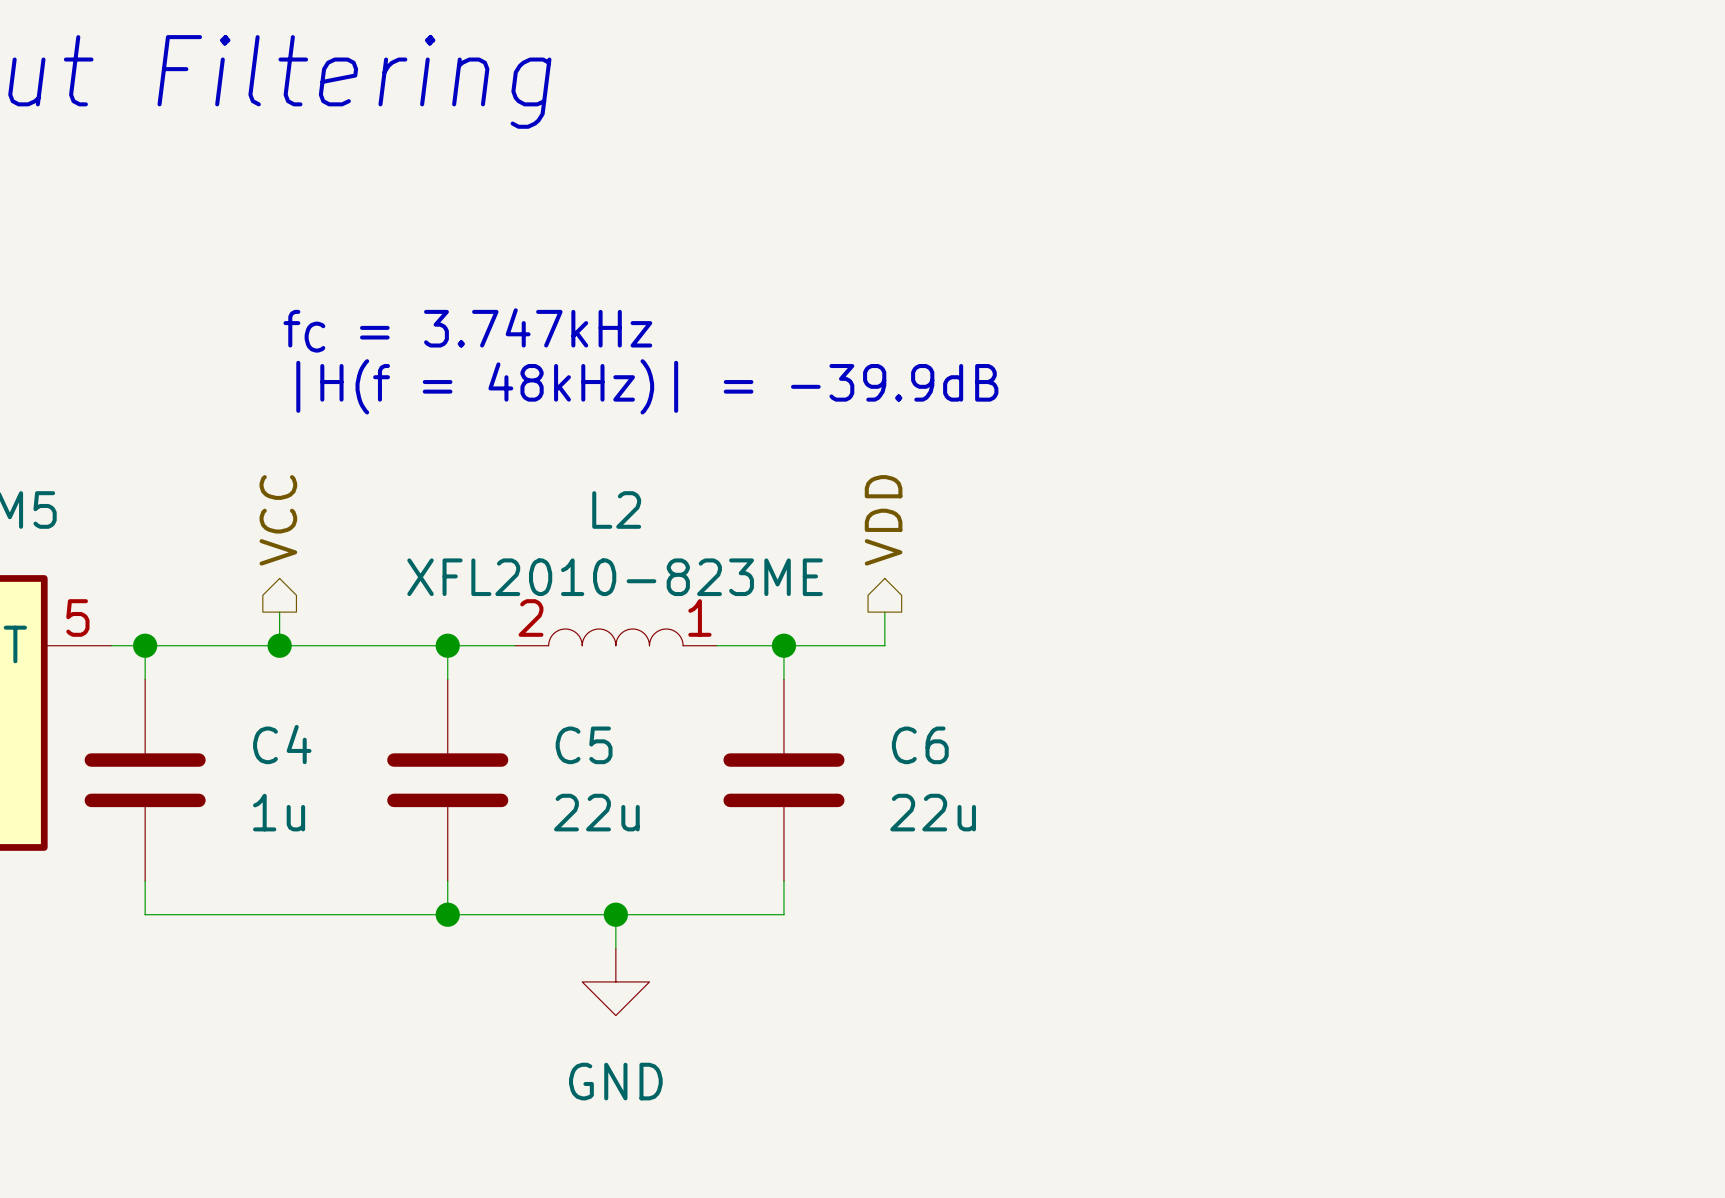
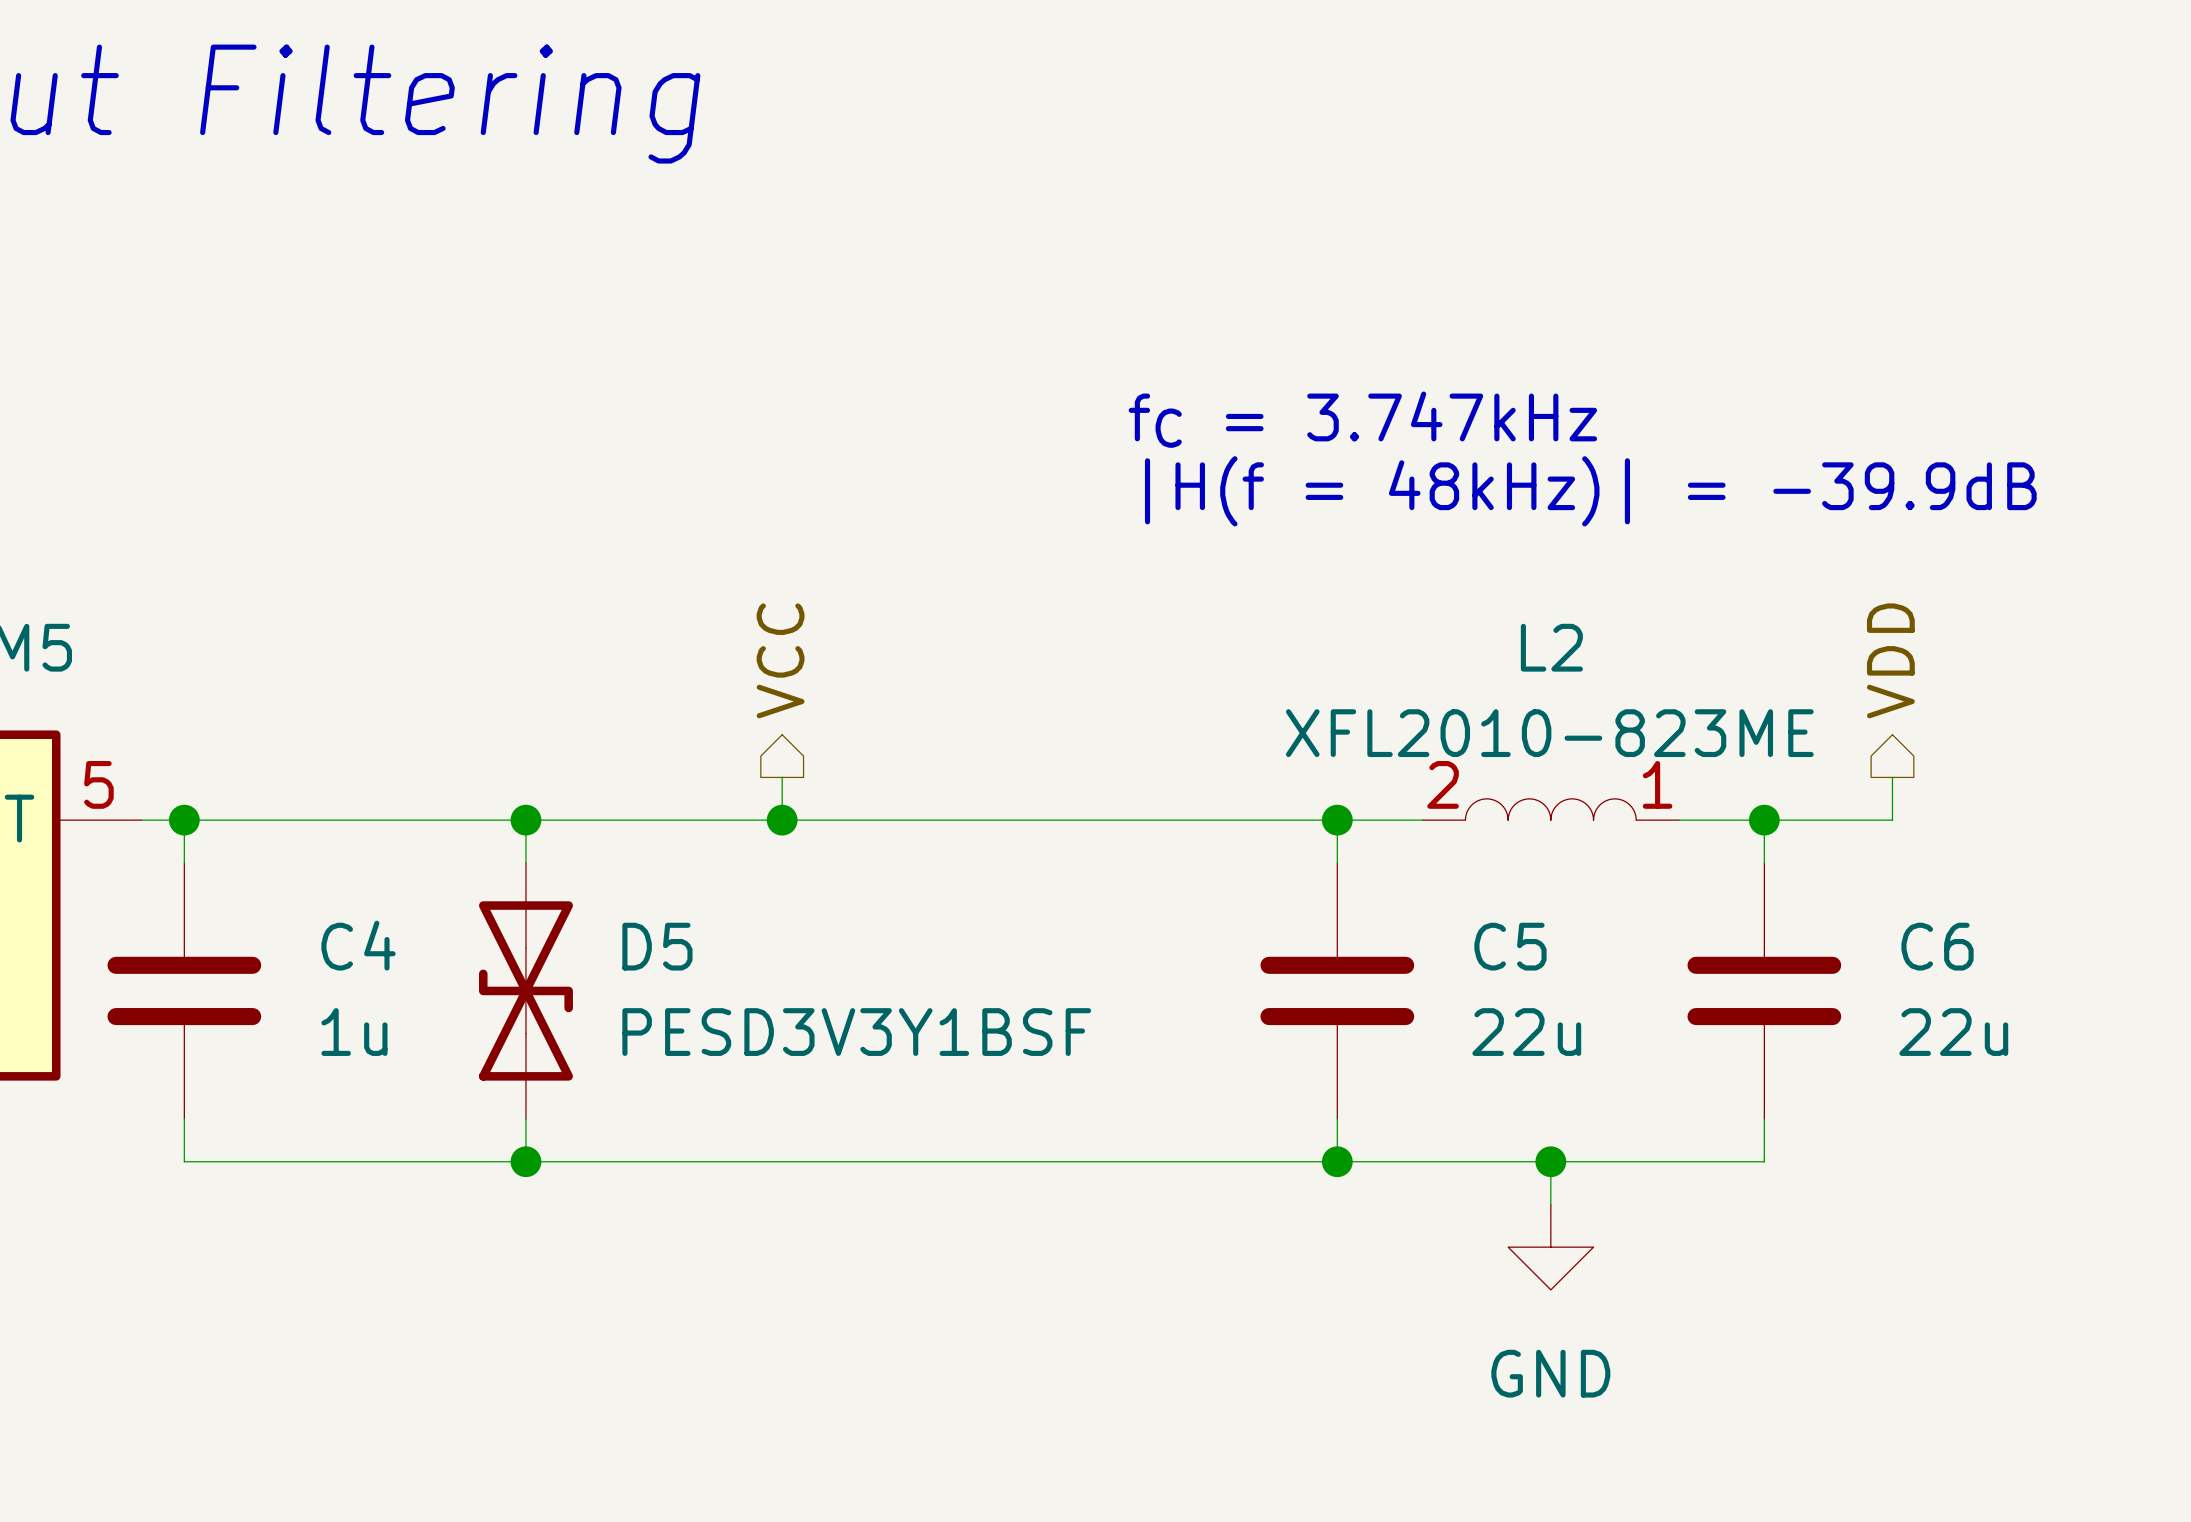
text position: fC = 3.747kHz (467, 330) -> fC = 3.747kHz (1362, 419)
text position: |H(f = 48kHz)| = -39.9dB (647, 386) -> |H(f = 48kHz)| = -39.9dB (1590, 491)
hierarchical label position: VCC (278, 520) -> VCC (780, 660)
hierarchical label position: VDD (883, 520) -> VDD (1890, 660)
wire: (279, 612) (279, 645) -> (525, 820) (525, 862)
wire: none -> (782, 777) (782, 820)
wire: (884, 612) (884, 645) -> (1422, 820) (1123, 820)
wire: none -> (1892, 777) (1892, 820) (1678, 820)
L2 position: (615, 637) -> (1550, 809)
junction: (279, 645) -> none
wire: (447, 645) (447, 679) -> (1337, 820) (1337, 862)
junction position: (447, 645) -> (525, 820)
wire: none -> (654, 820) (910, 820)
junction: none -> (782, 820)
wire: (783, 645) (783, 679) -> (1764, 820) (1764, 862)
junction: (783, 645) -> none
junction: none -> (1337, 820)
junction: none -> (1764, 820)
D5: none -> PESD3V3Y1BSF (525, 990)
C5 position: (447, 780) -> (1337, 990)
C6 position: (783, 780) -> (1764, 990)
wire: none -> (525, 1119) (525, 1161)
wire: (447, 881) (447, 914) -> (1337, 1119) (1337, 1161)
wire: (783, 881) (783, 914) -> (1764, 1119) (1764, 1161) (995, 1161)
junction position: (447, 914) -> (525, 1161)
wire: (615, 914) (615, 948) -> (1550, 1161) (1550, 1204)
junction: (615, 914) -> none
junction: none -> (1337, 1161)
junction: none -> (1550, 1161)
power symbol position: GND (615, 981) -> GND (1550, 1247)

